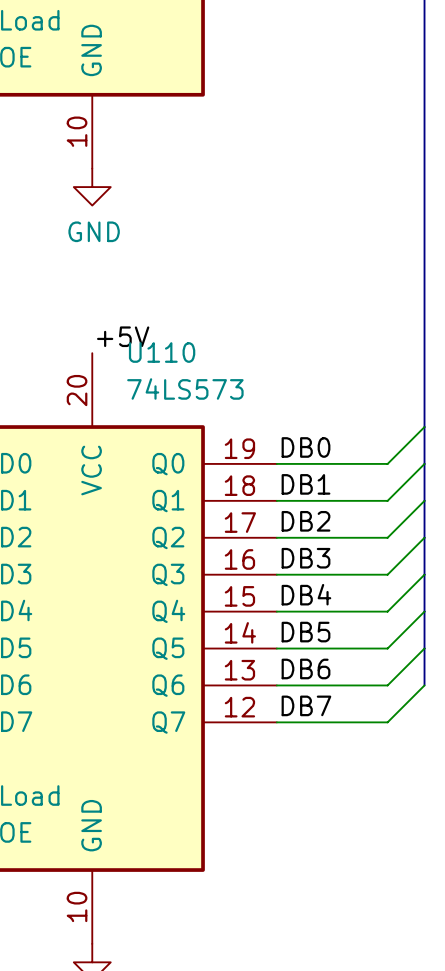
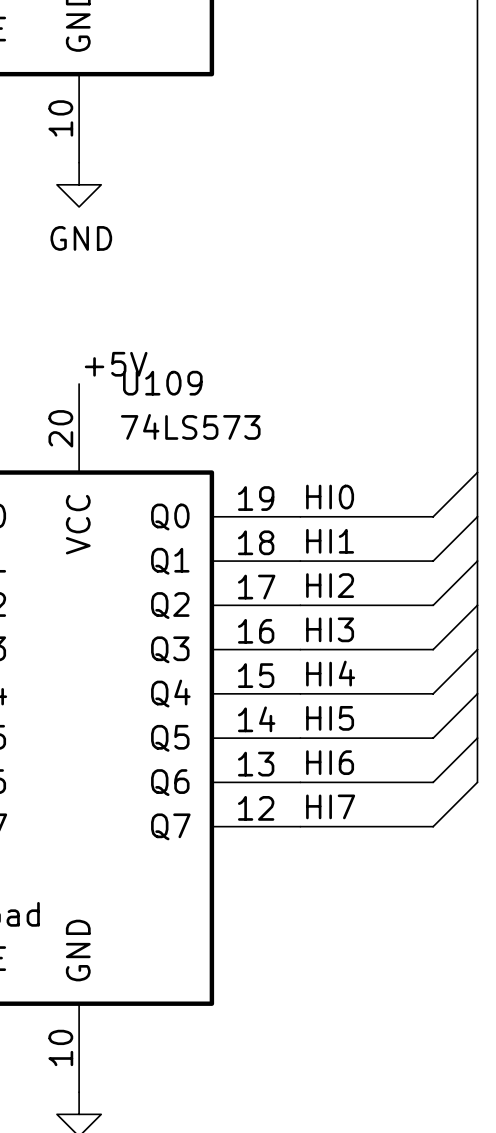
U110 name: U110 (162, 352) -> U109 (162, 383)
label: DB0 (306, 447) -> HI0 (330, 497)
label: DB1 (306, 484) -> HI1 (330, 541)
label: DB2 (306, 521) -> HI2 (330, 585)
label: DB3 (306, 558) -> HI3 (330, 629)
label: DB4 (306, 594) -> HI4 (330, 673)
label: DB5 (306, 632) -> HI5 (330, 718)
label: DB6 (306, 668) -> HI6 (330, 762)
label: DB7 (306, 705) -> HI7 (330, 806)

